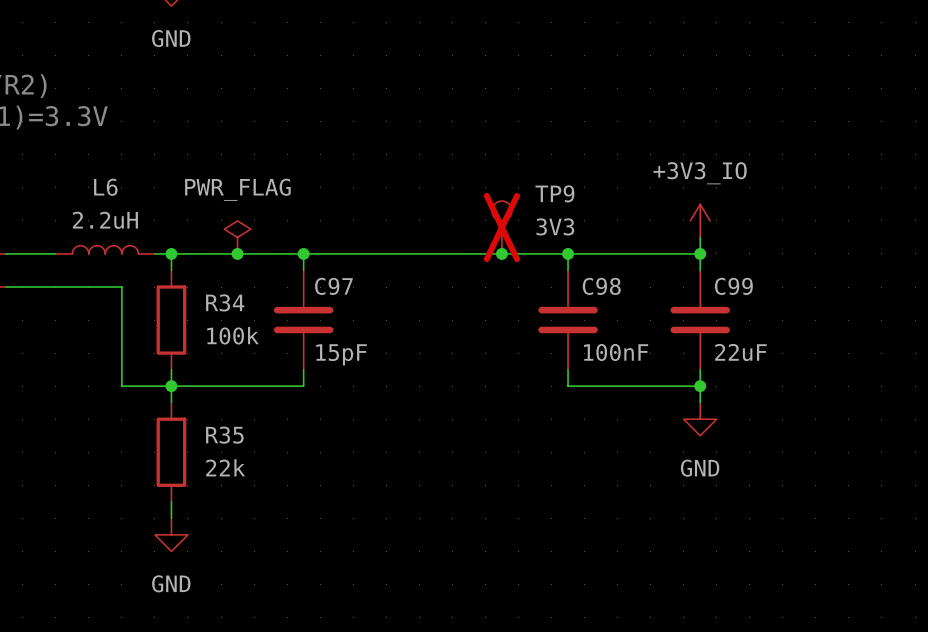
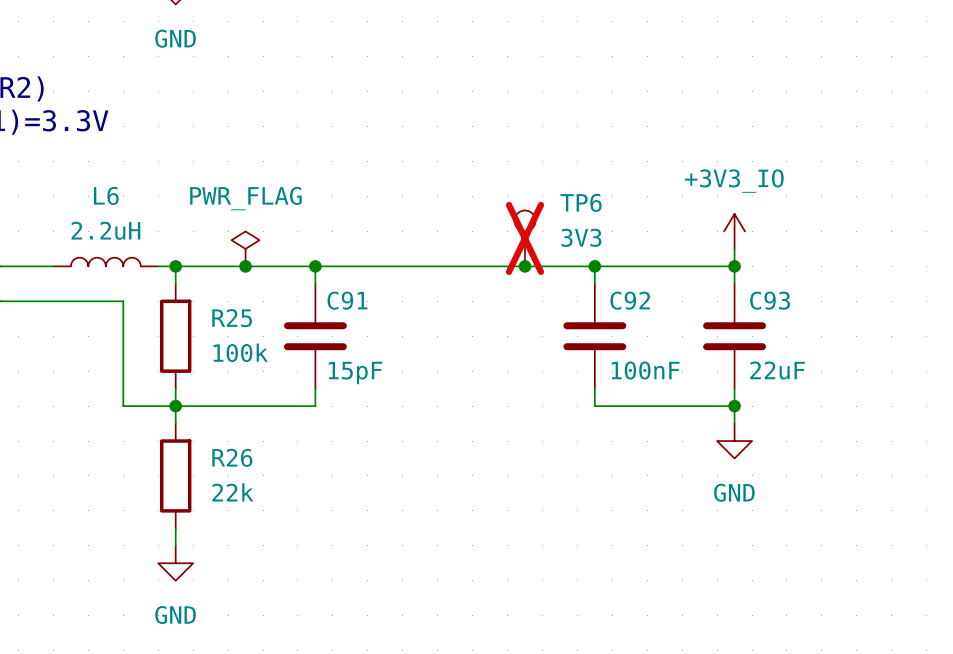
TP9 name: TP9 (554, 193) -> TP6 (581, 202)
C97 name: C97 (333, 286) -> C91 (347, 300)
C98 name: C98 (601, 286) -> C92 (630, 300)
C99 name: C99 (733, 286) -> C93 (770, 300)
R34 name: R34 (225, 302) -> R25 (232, 318)
R35 name: R35 (224, 435) -> R26 (232, 457)

